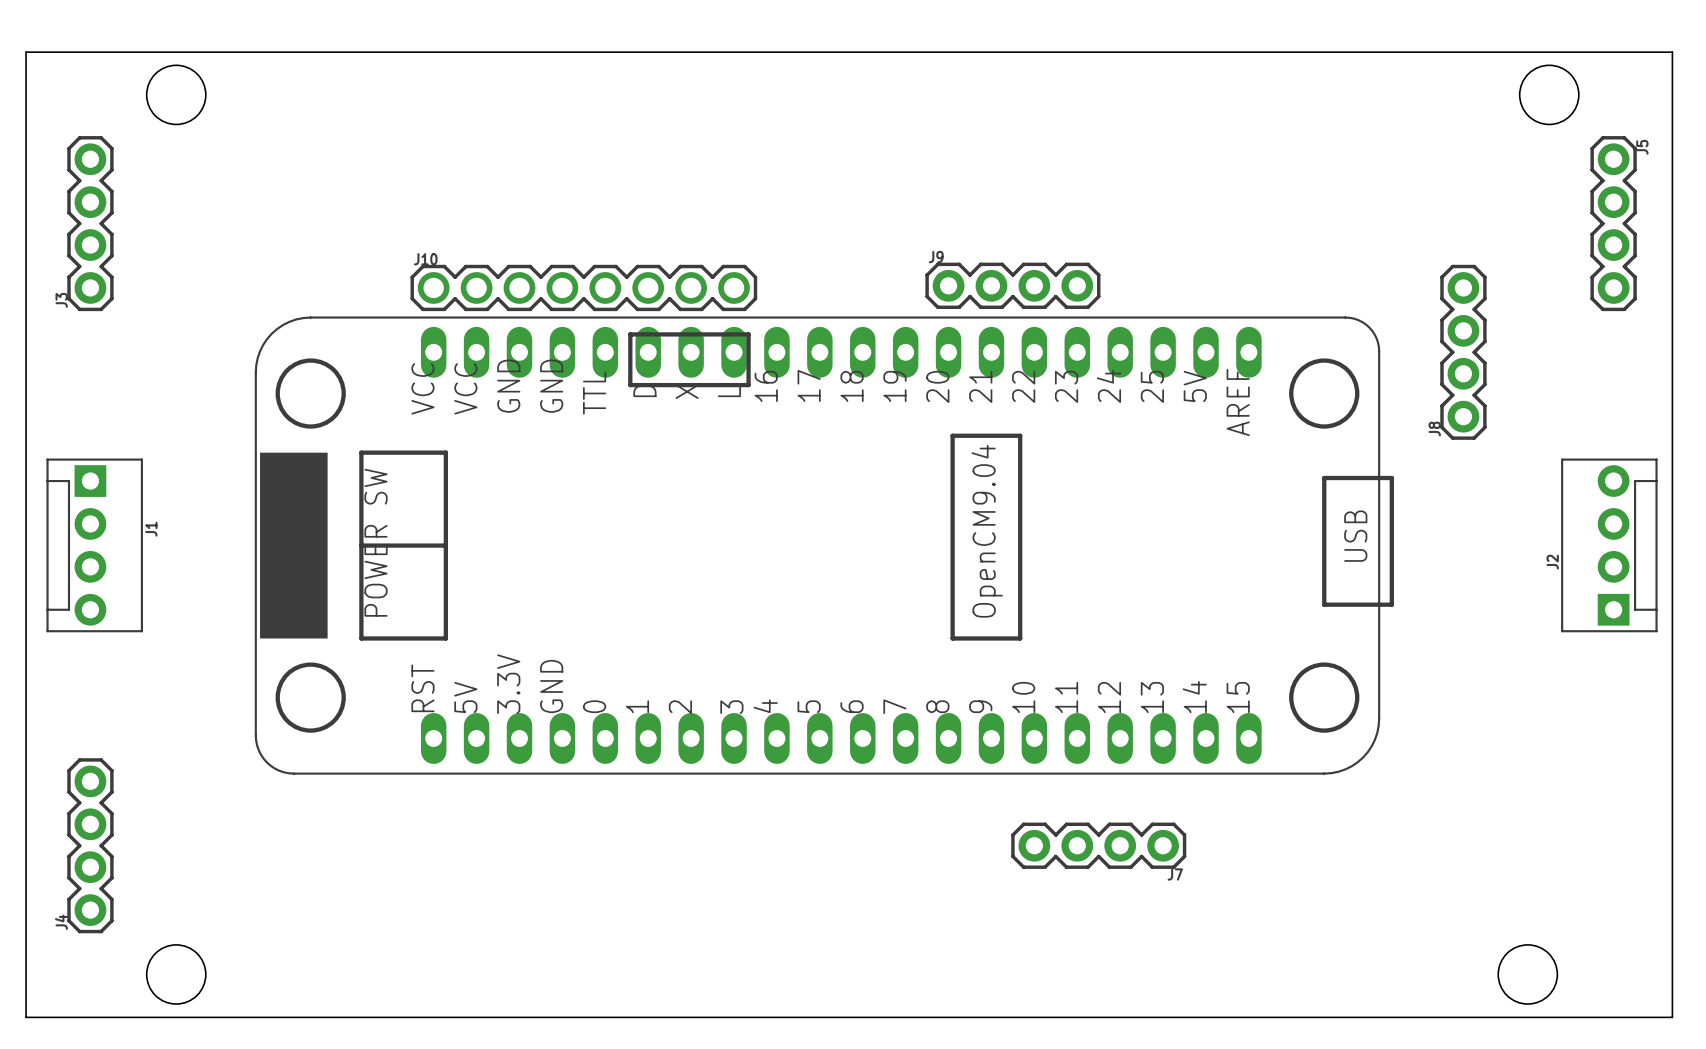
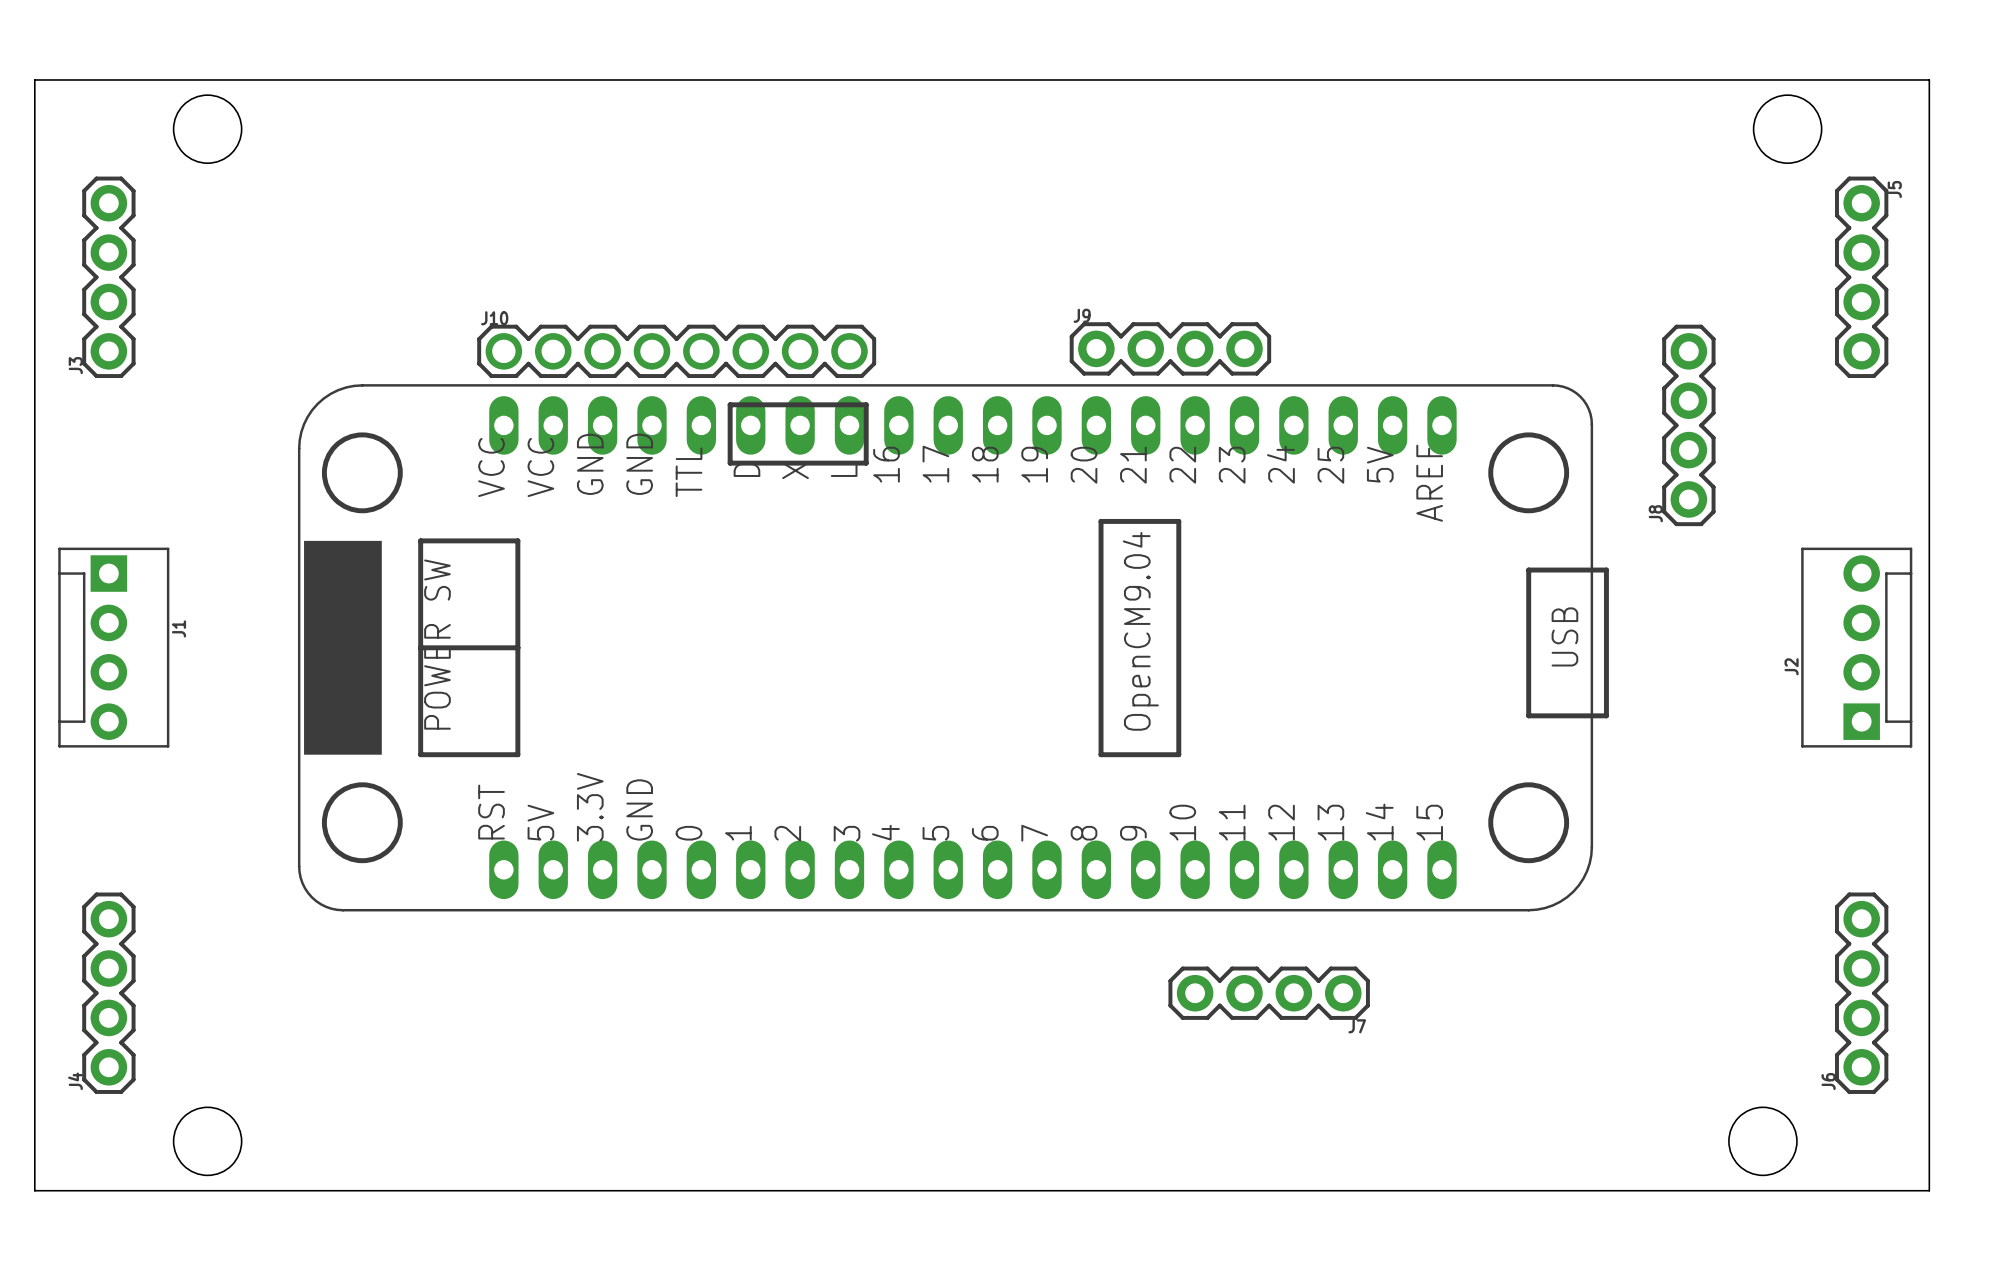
J6: none -> (1861, 993)

